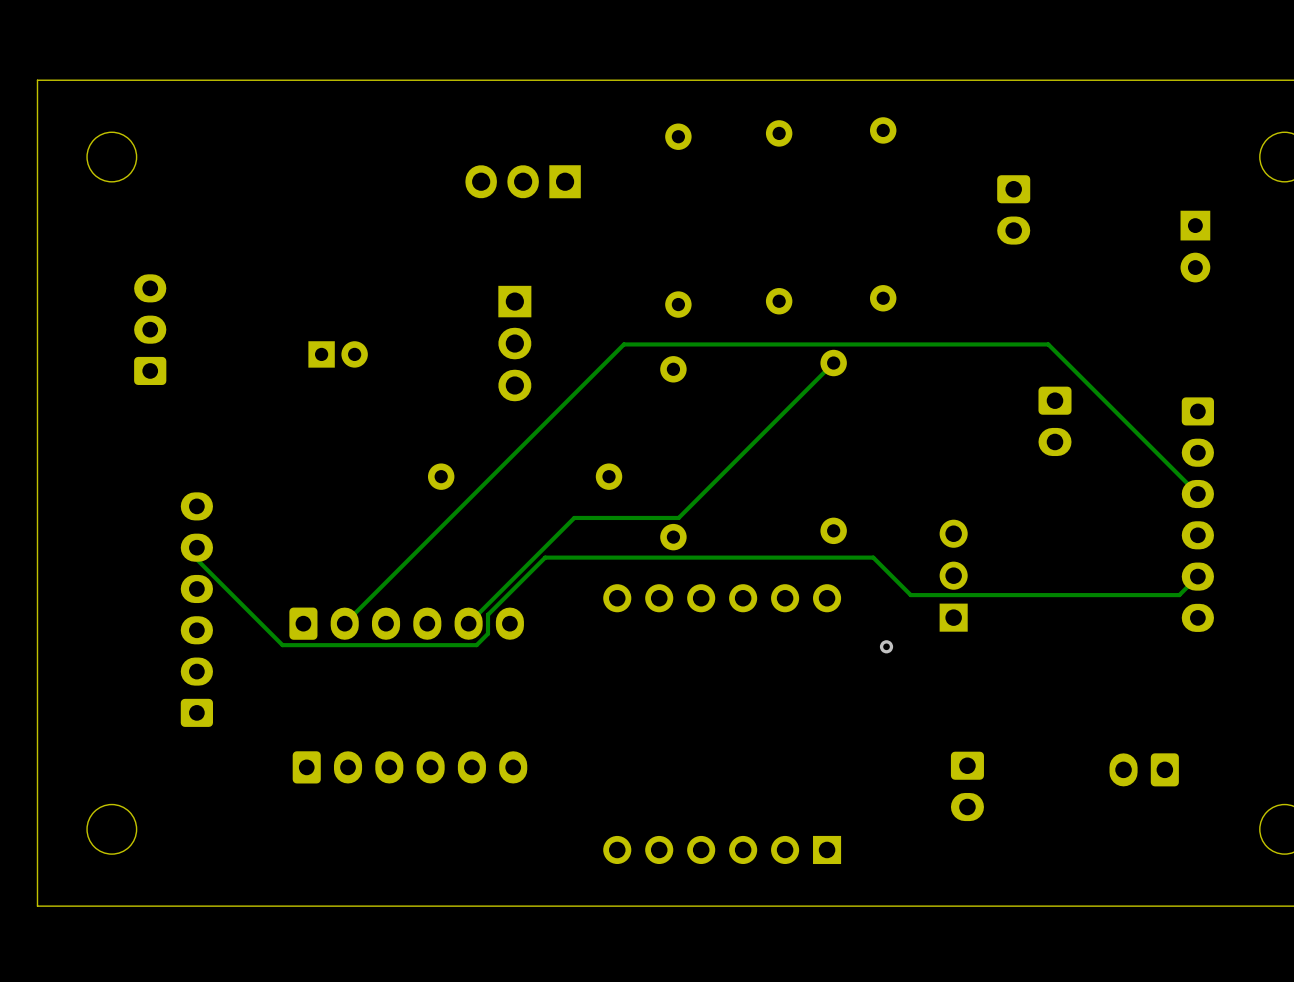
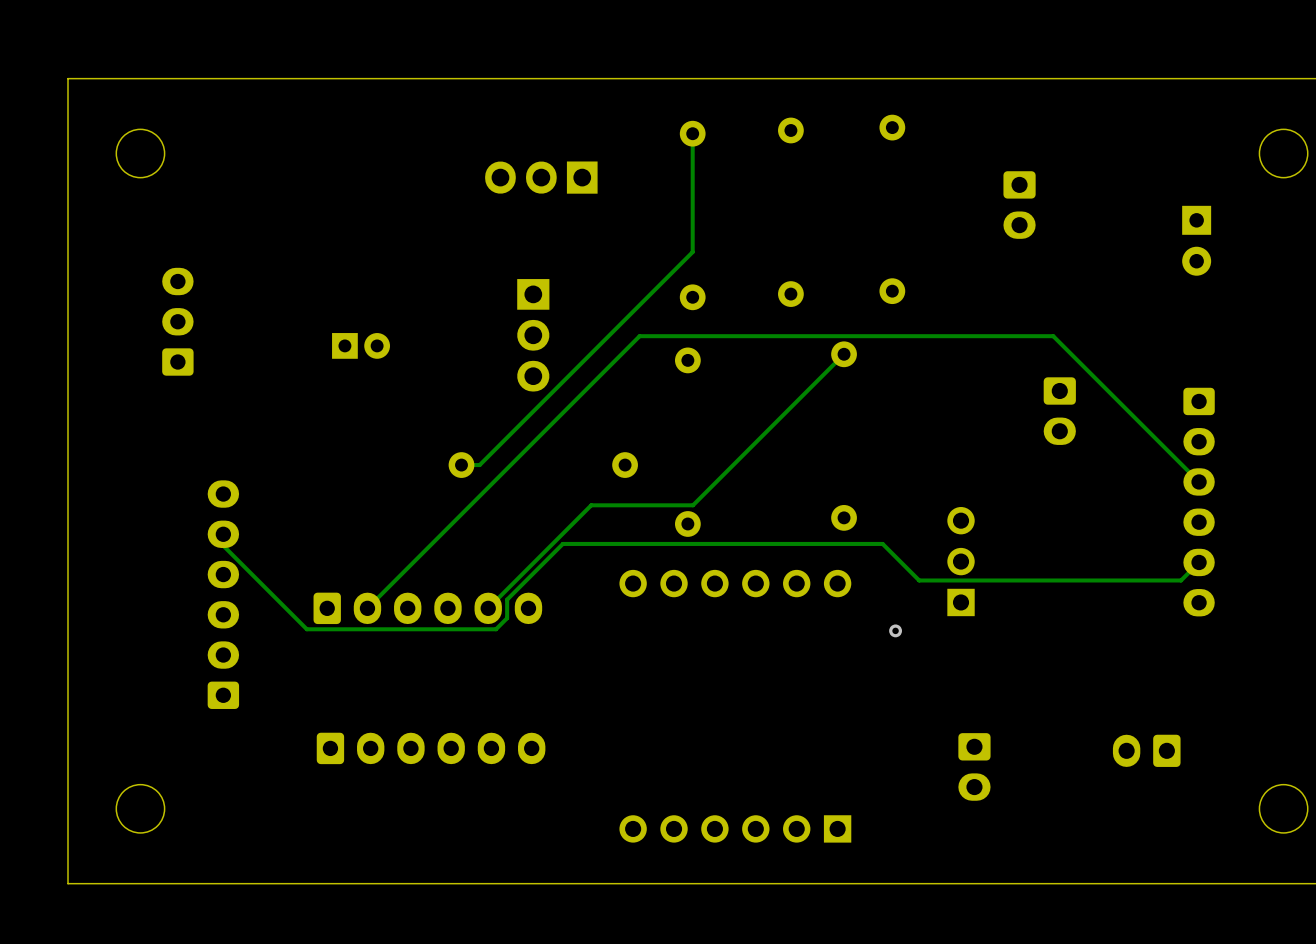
track: none -> (692, 133) (692, 252) (479, 465) (461, 465)

